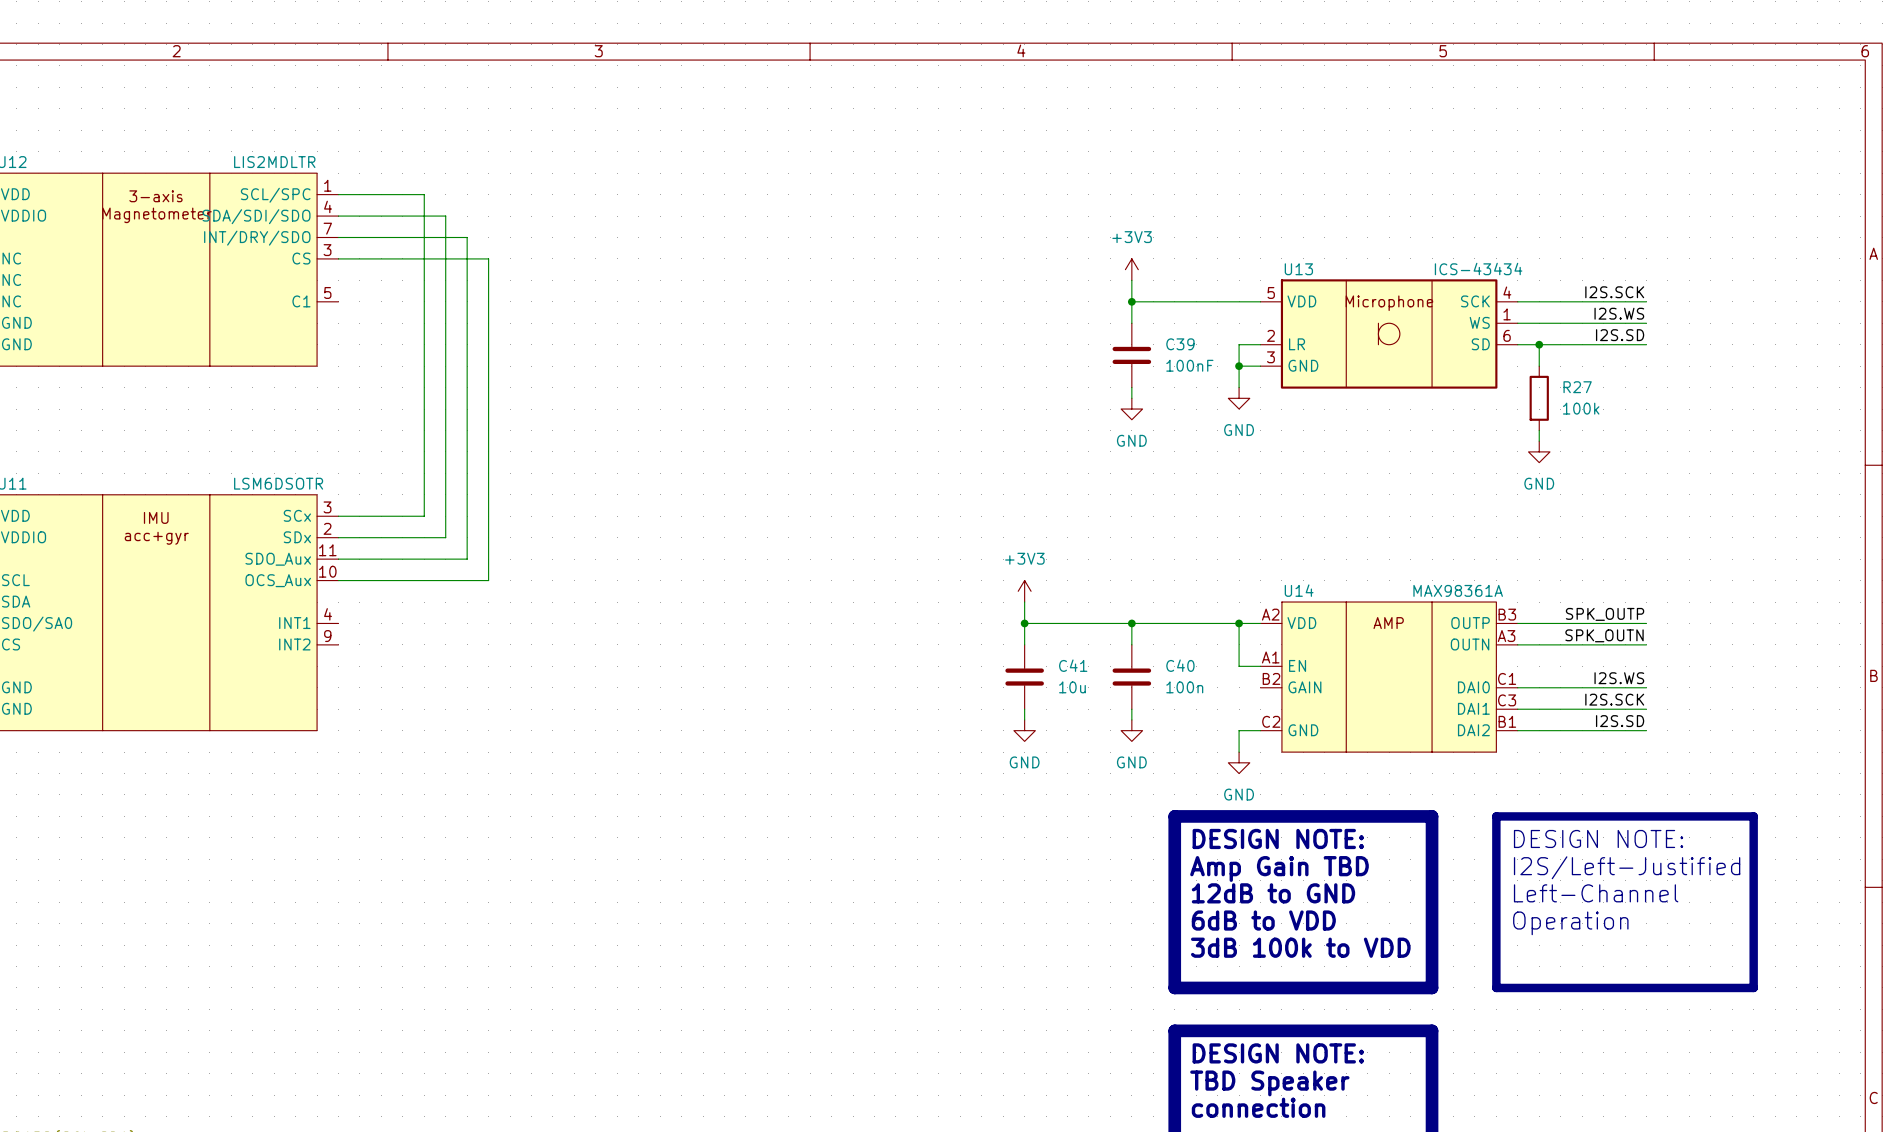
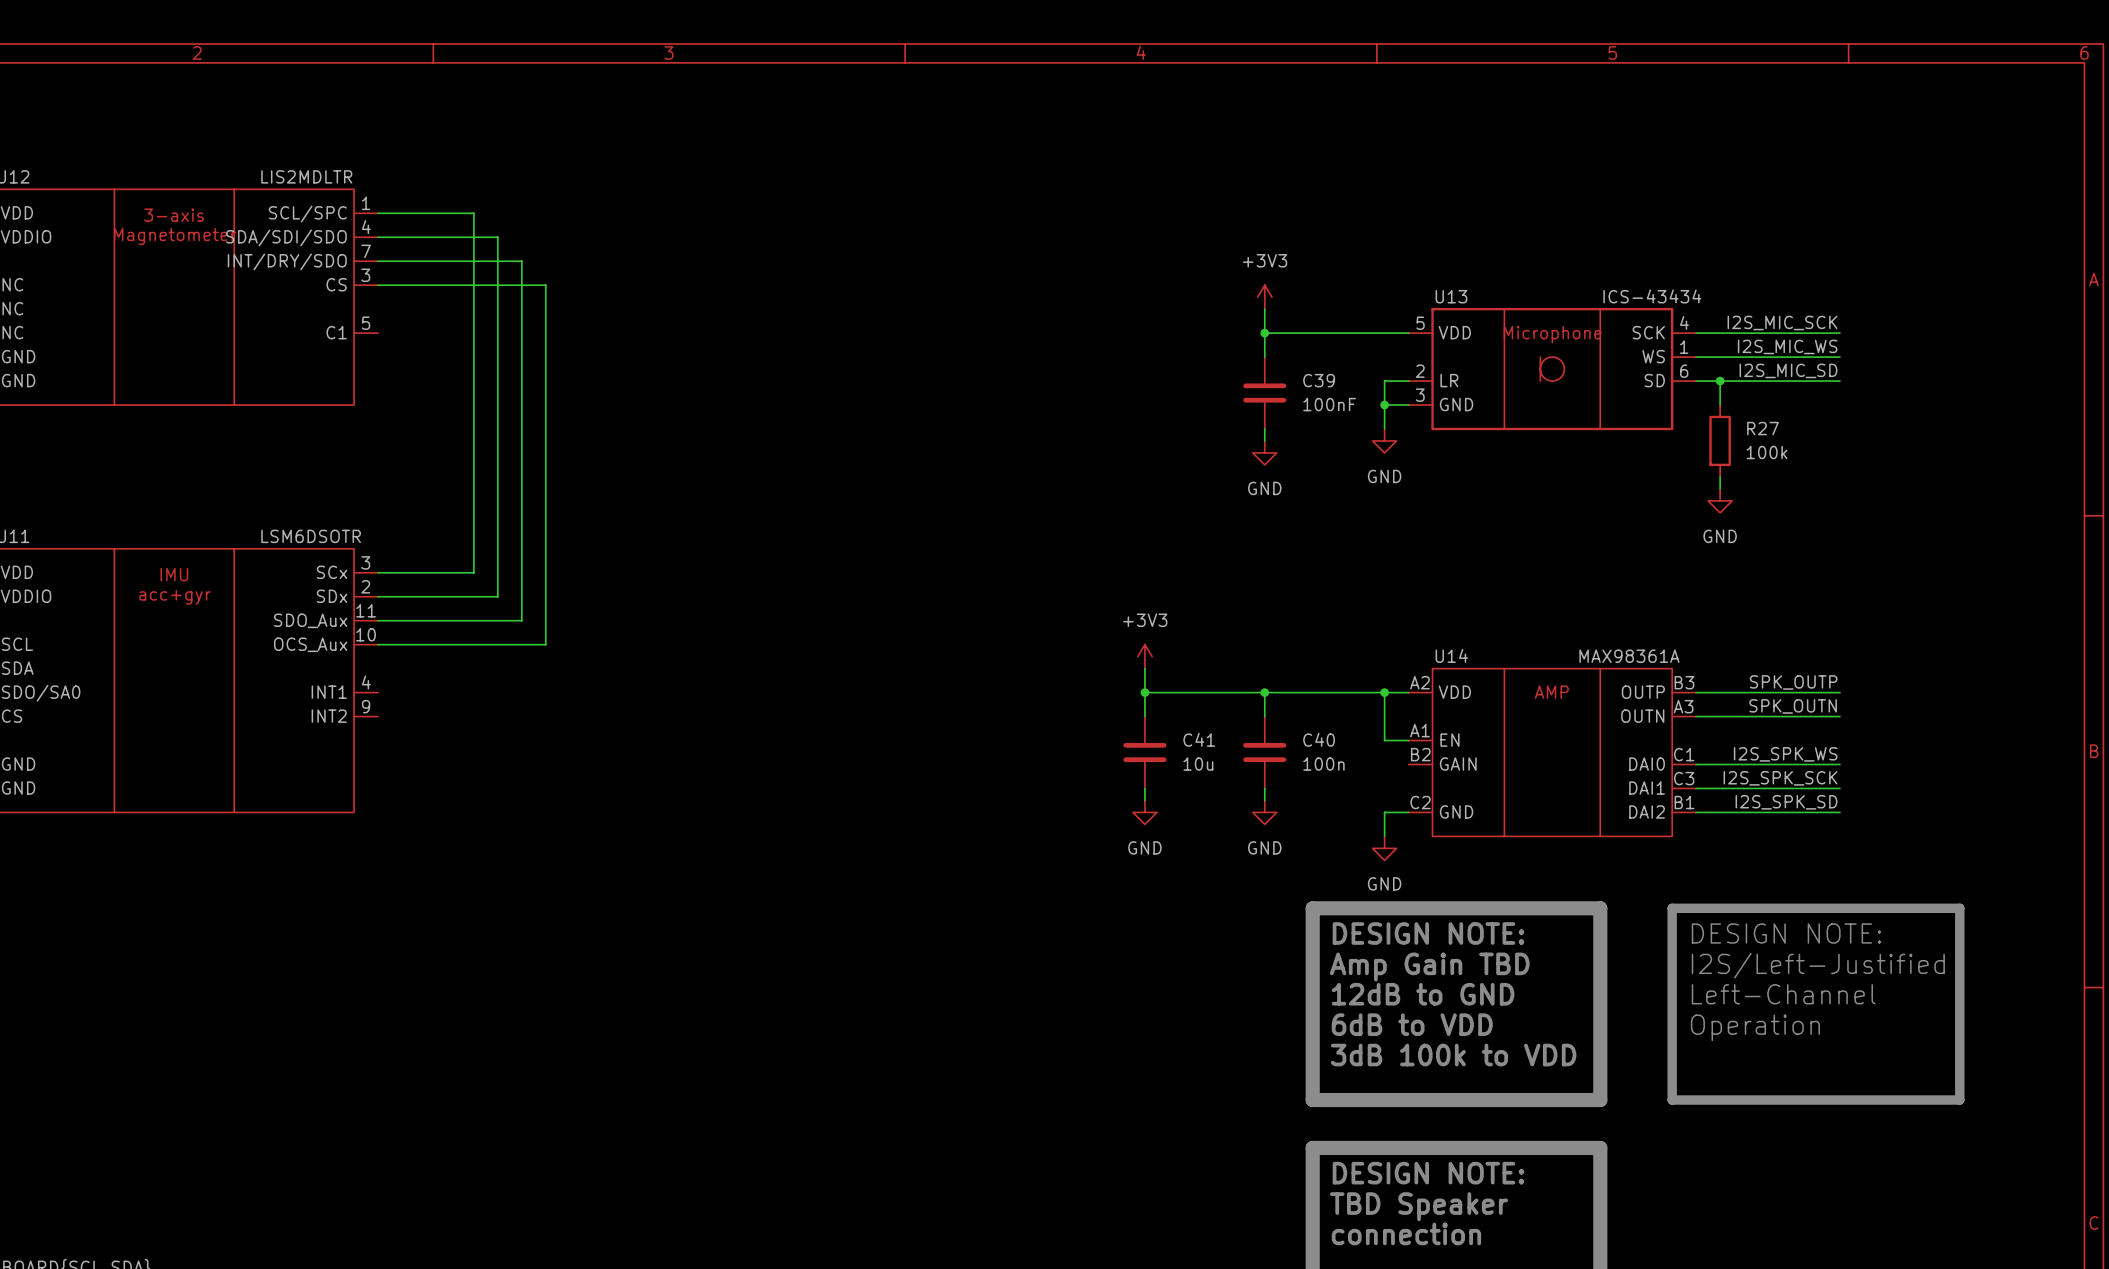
label: I2S.SCK (1614, 292) -> I2S_MIC_SCK (1782, 322)
label: I2S.WS (1619, 313) -> I2S_MIC_WS (1787, 346)
label: I2S.SD (1620, 335) -> I2S_MIC_SD (1788, 370)
label: I2S.WS (1619, 678) -> I2S_SPK_WS (1785, 754)
label: I2S.SCK (1614, 699) -> I2S_SPK_SCK (1780, 778)
label: I2S.SD (1620, 721) -> I2S_SPK_SD (1786, 802)

